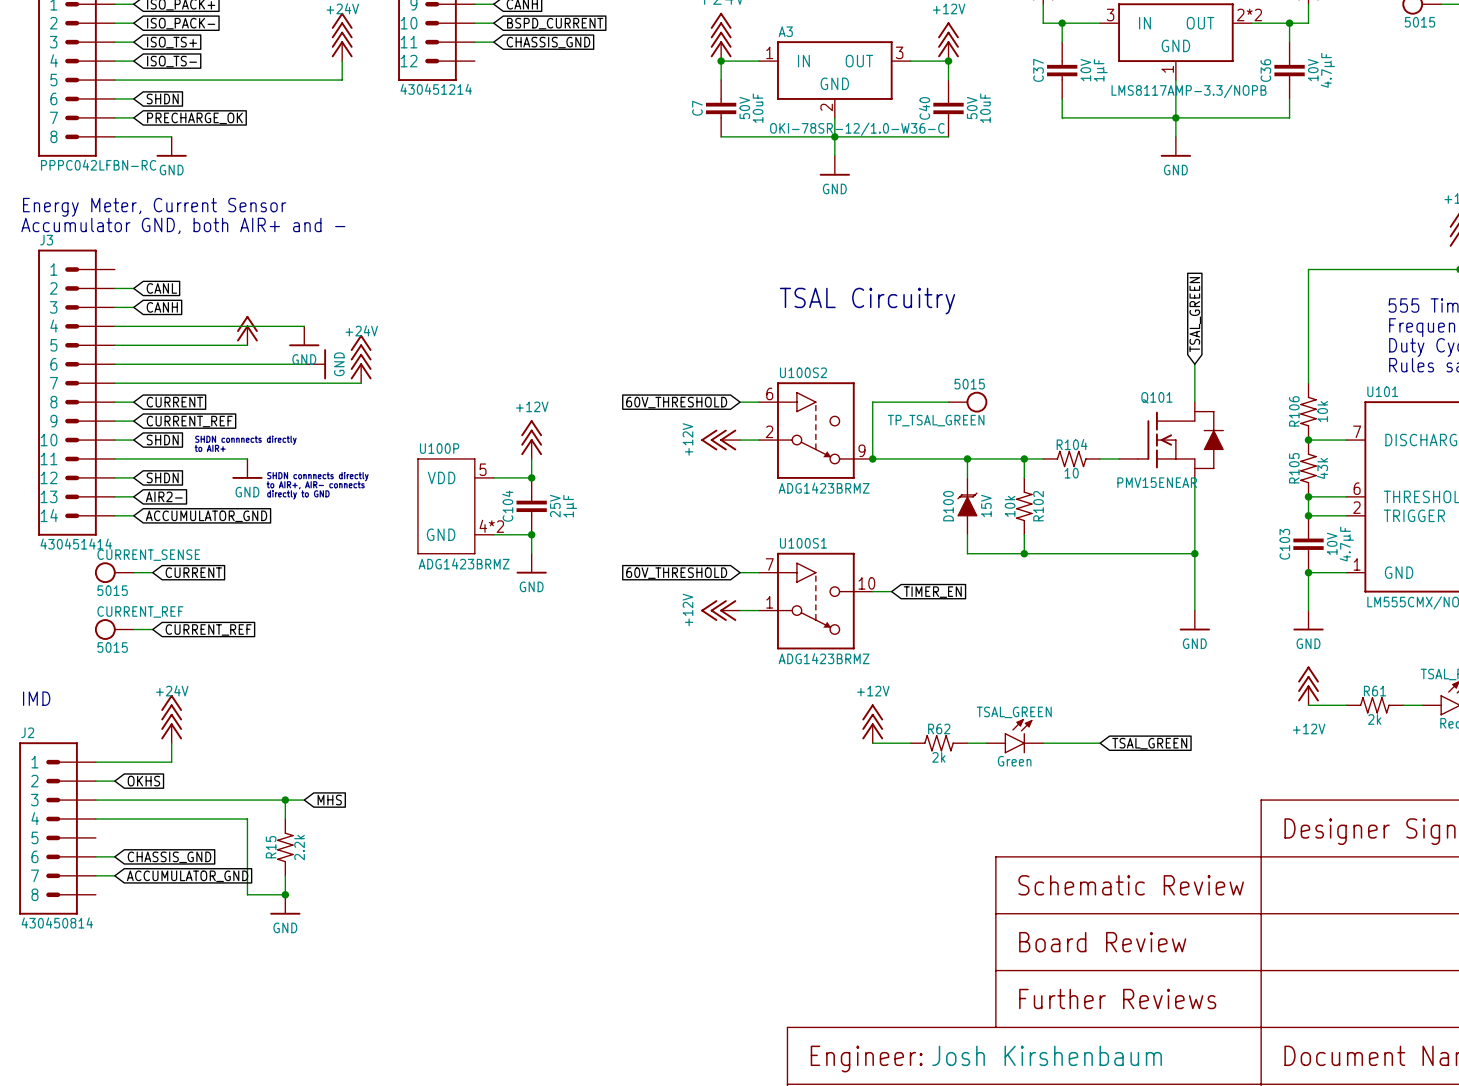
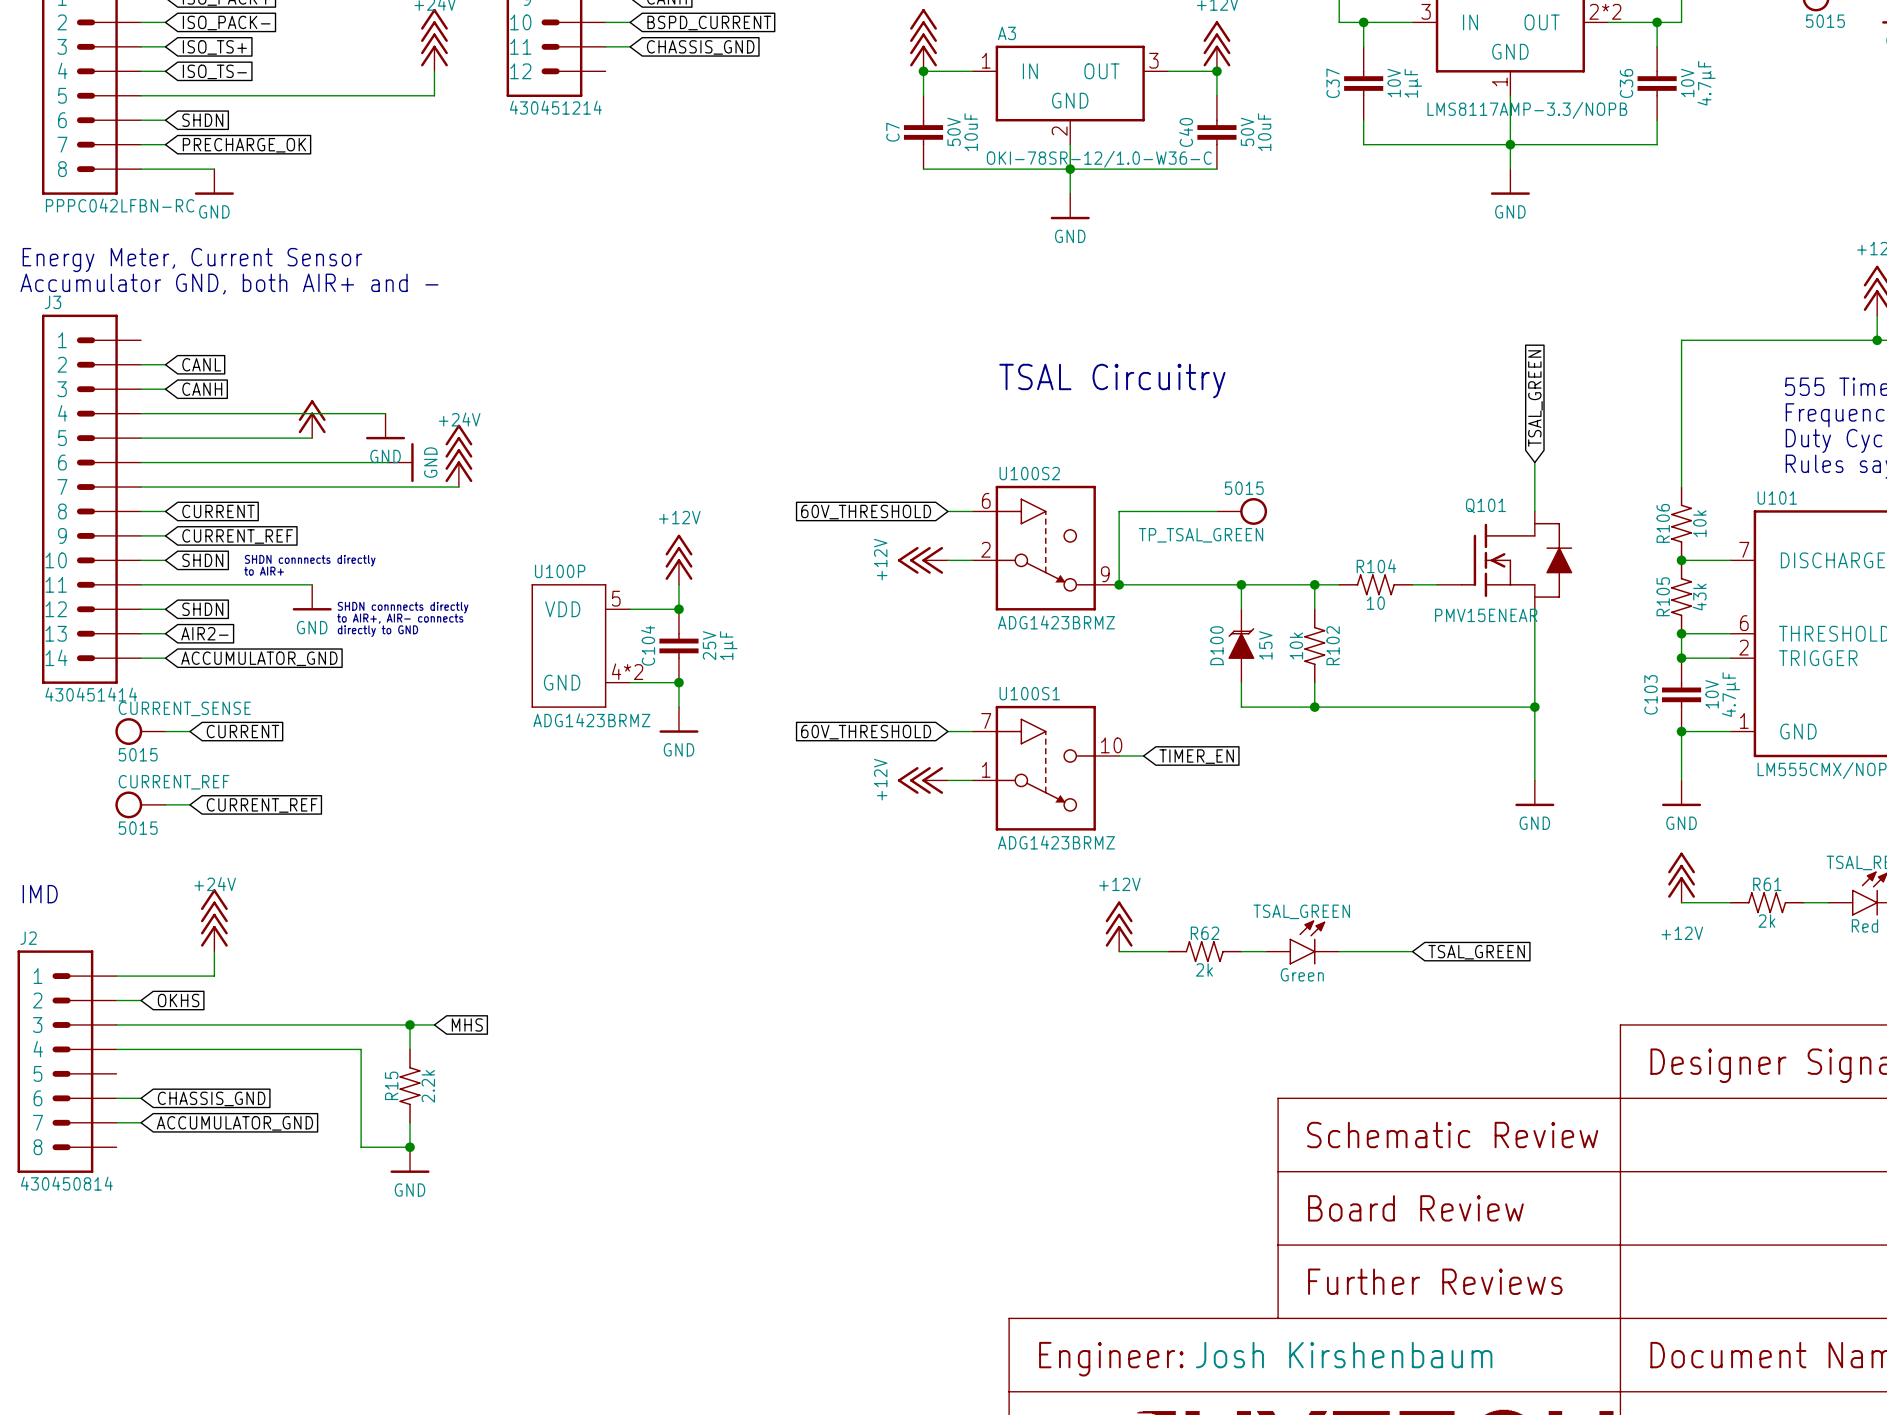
wire: (285, 800) (285, 818) -> (410, 1024) (410, 1049)
junction position: (285, 800) -> (410, 1024)
wire: none -> (385, 1024) (434, 1024)
global label position: MHS (329, 800) -> MHS (467, 1024)
wire: (247, 818) (247, 894) (285, 894) -> (312, 1049) (361, 1049) (361, 1122)
R15 position: (285, 847) -> (410, 1086)
wire: none -> (410, 1122) (410, 1147) (361, 1147)
junction position: (285, 894) -> (410, 1147)
power symbol position: GND (285, 904) -> GND (410, 1160)

